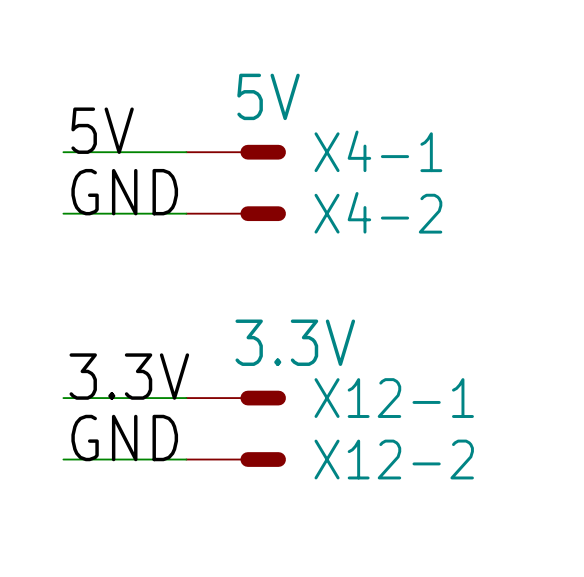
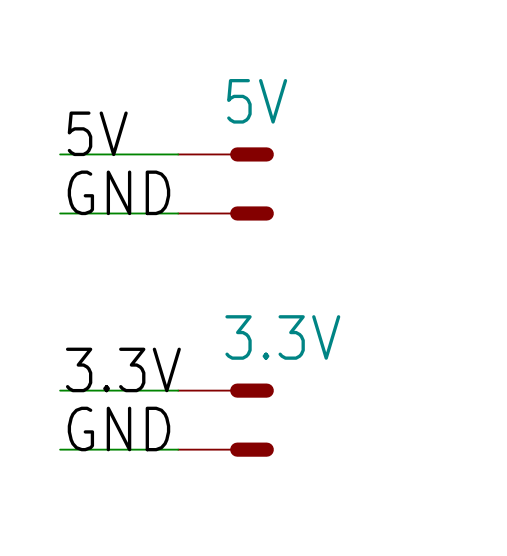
X4-1 name: X4-1 (378, 151) -> none
X4-2 name: X4-2 (378, 212) -> none
X12-1 name: X12-1 (394, 398) -> none
X12-2 name: X12-2 (394, 459) -> none

